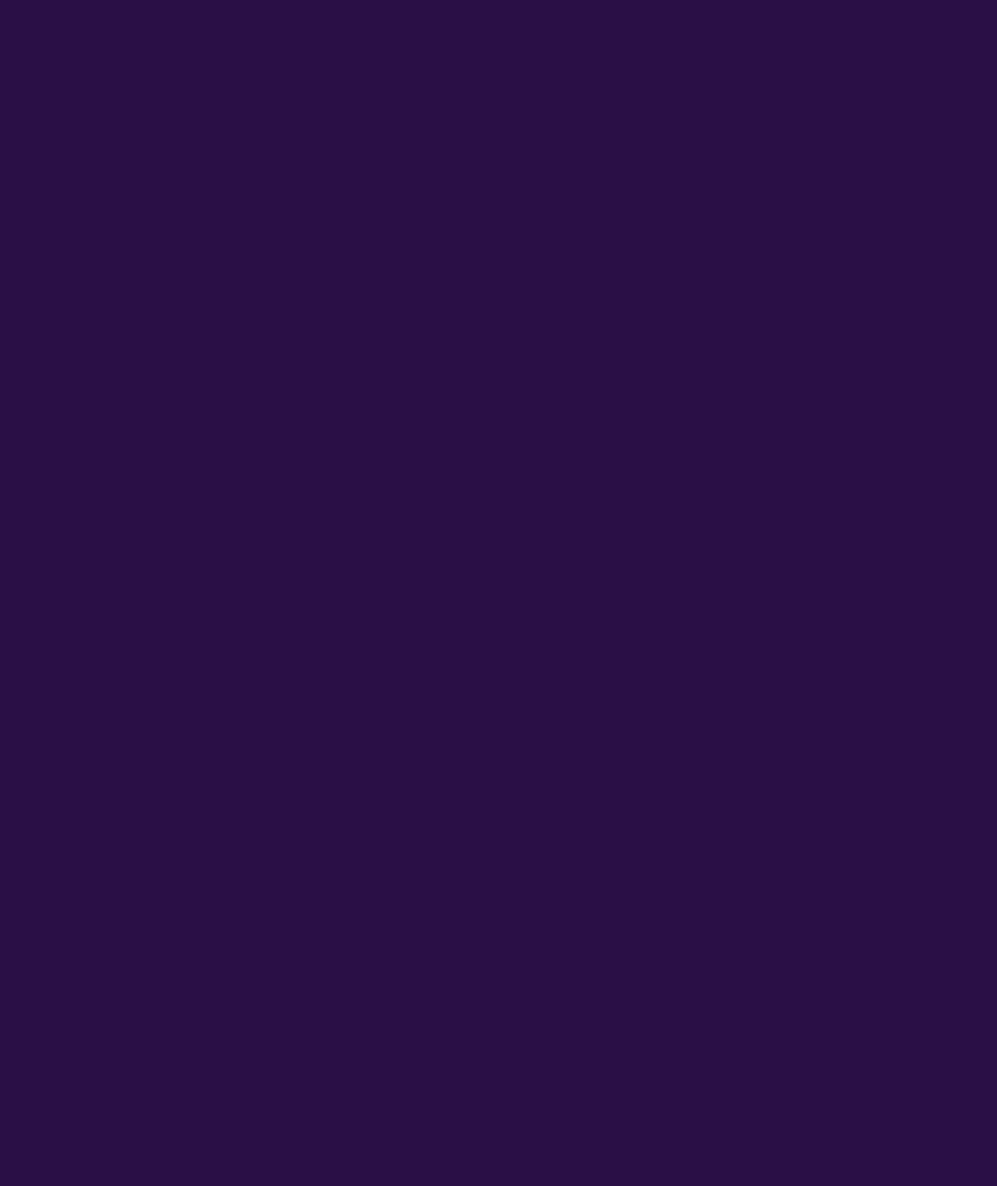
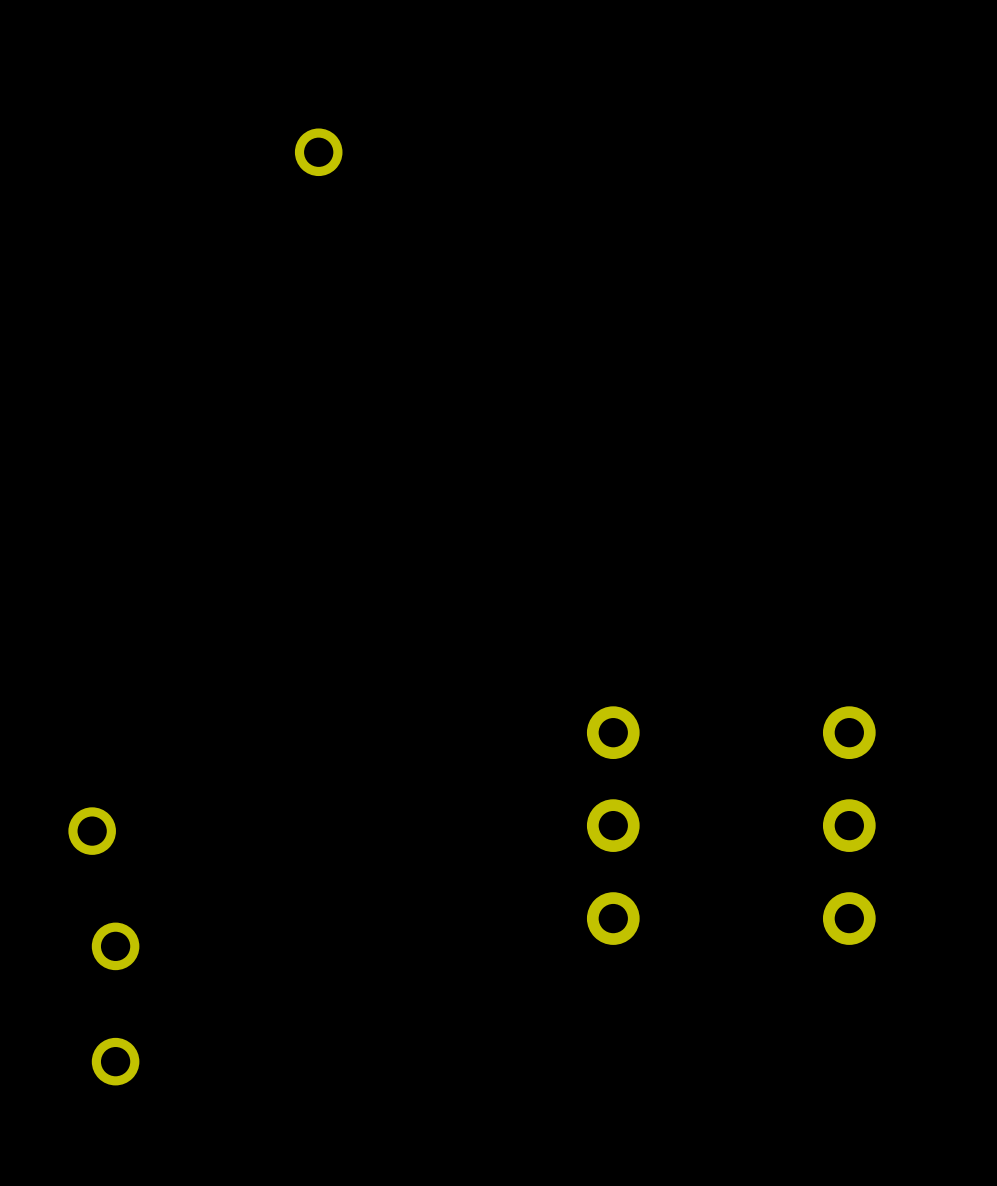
part: none -> (318, 152)
part: none -> (613, 825)
part: none -> (849, 825)
part: none -> (92, 831)
part: none -> (115, 946)
part: none -> (115, 1061)

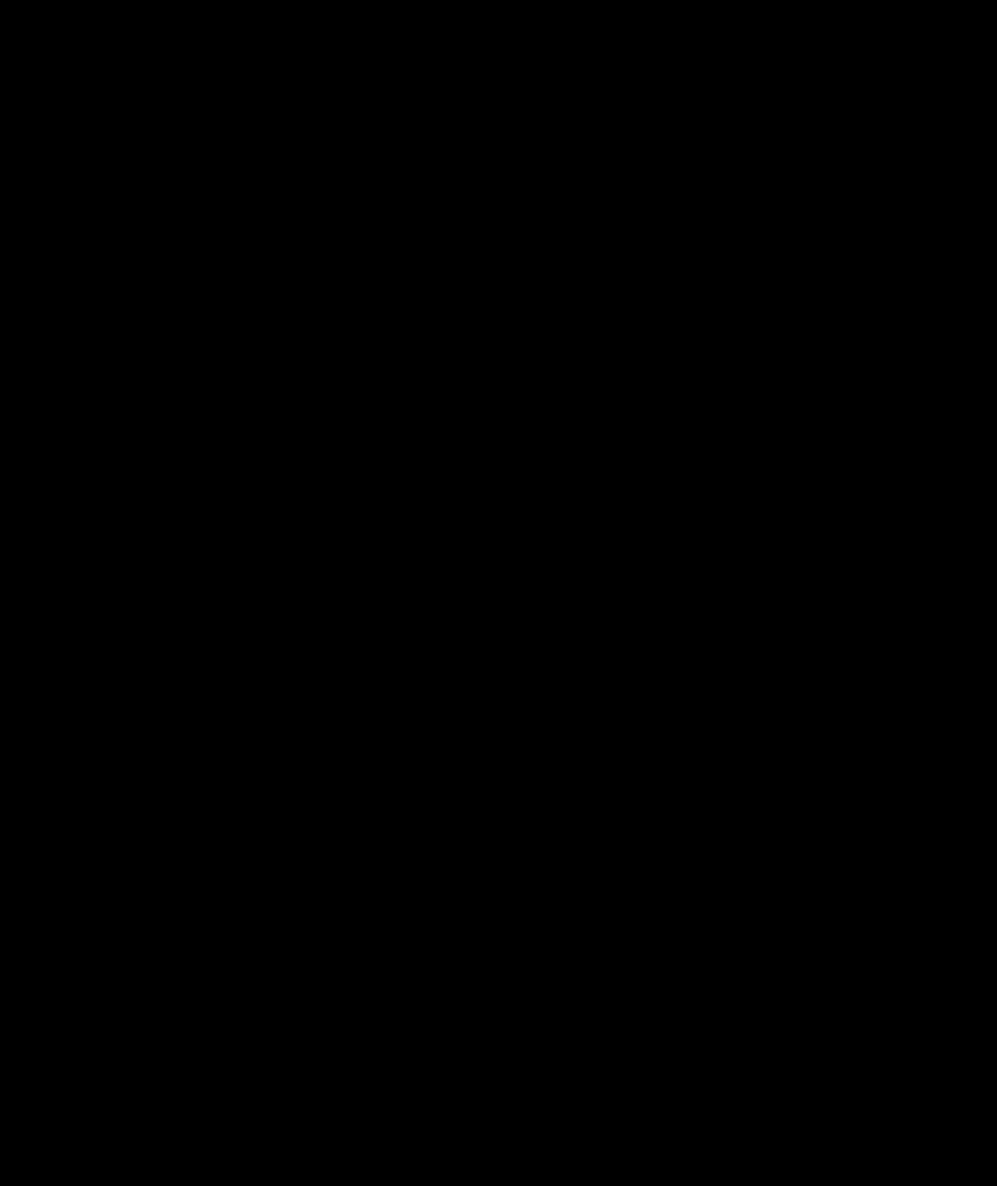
part: (318, 152) -> none
part: (613, 825) -> none
part: (849, 825) -> none
part: (92, 831) -> none
part: (115, 946) -> none
part: (115, 1061) -> none

